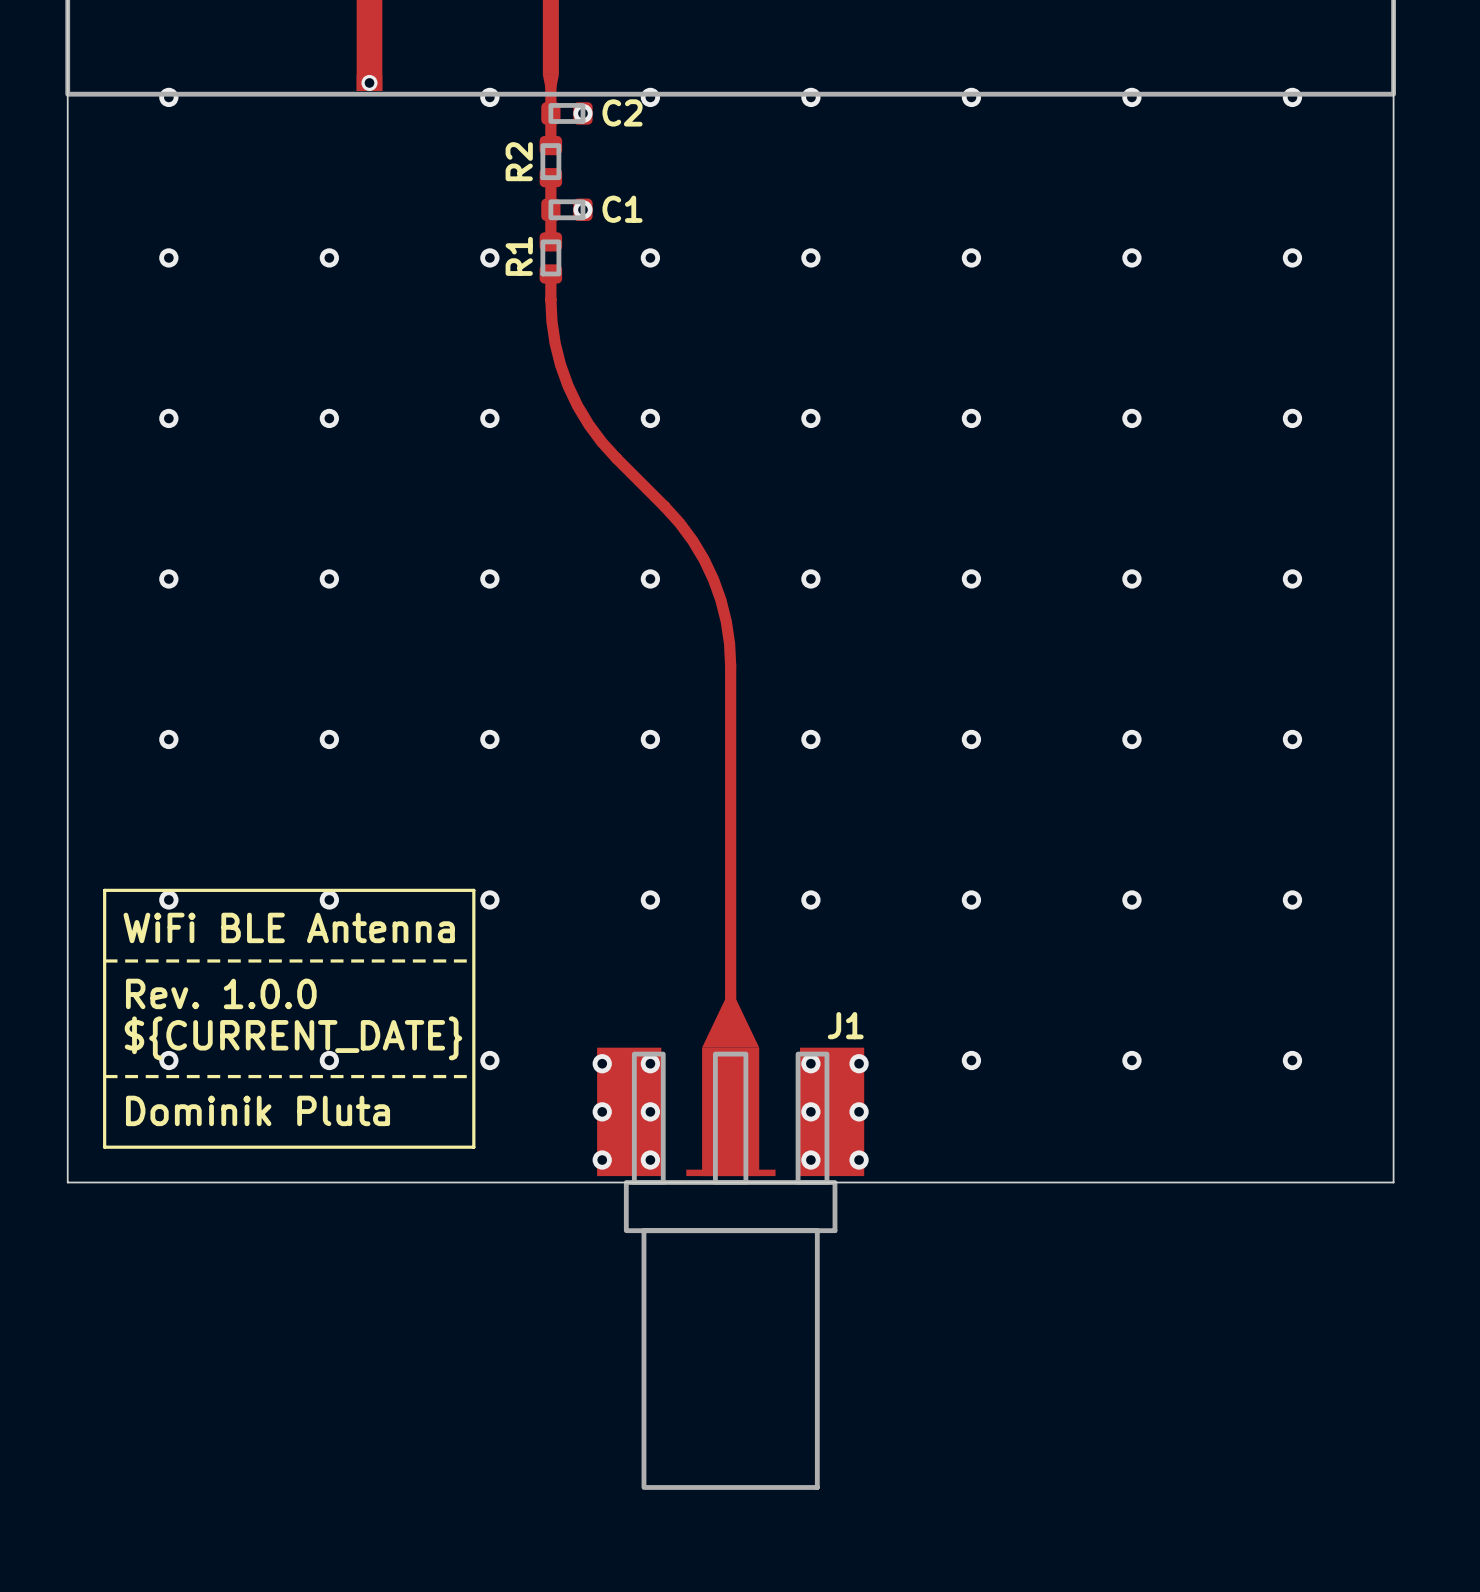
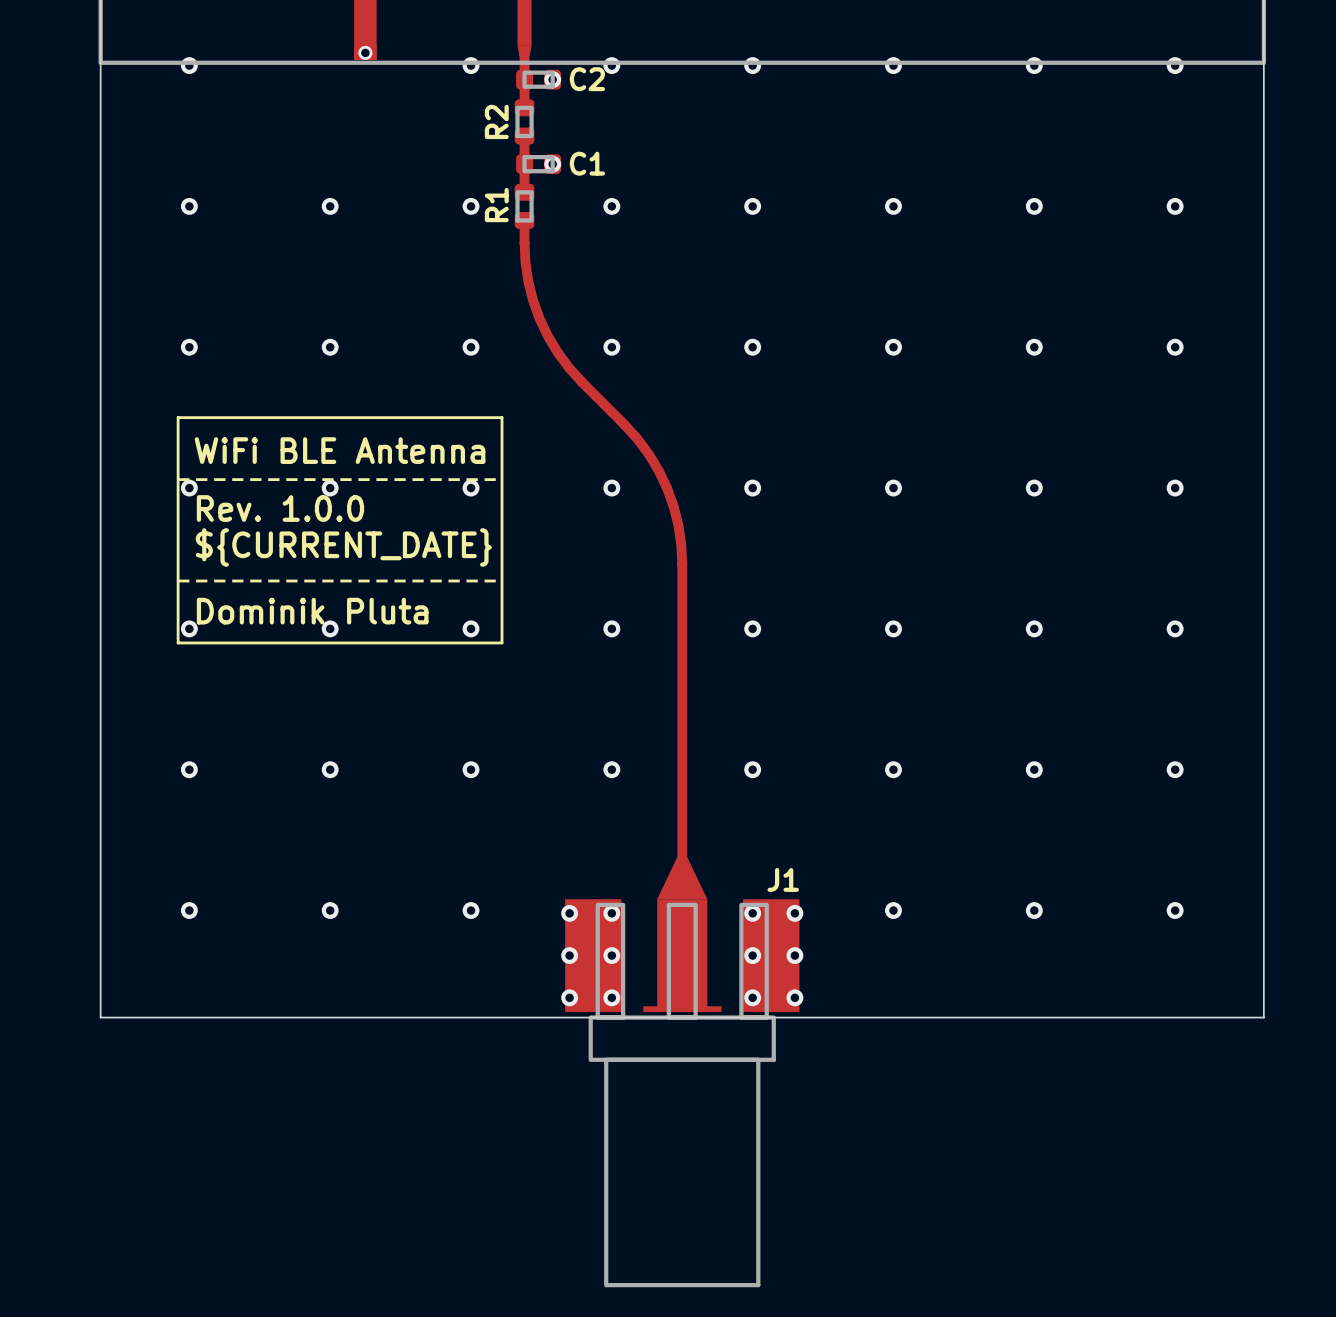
line: (104, 890) (473, 890) (473, 1147) (104, 1147) (104, 890) -> (178, 417) (502, 417) (502, 642) (178, 642) (178, 417)
text position: WiFi BLE Antenna (289, 927) -> WiFi BLE Antenna (340, 450)
line: (104, 960) (473, 960) -> (178, 479) (502, 479)
text position: Rev. 1.0.0 (221, 993) -> Rev. 1.0.0 (280, 508)
text position: ${CURRENT_DATE} (293, 1038) -> ${CURRENT_DATE} (343, 547)
line: (104, 1076) (473, 1076) -> (178, 581) (502, 581)
text position: Dominik Pluta (258, 1110) -> Dominik Pluta (312, 611)

